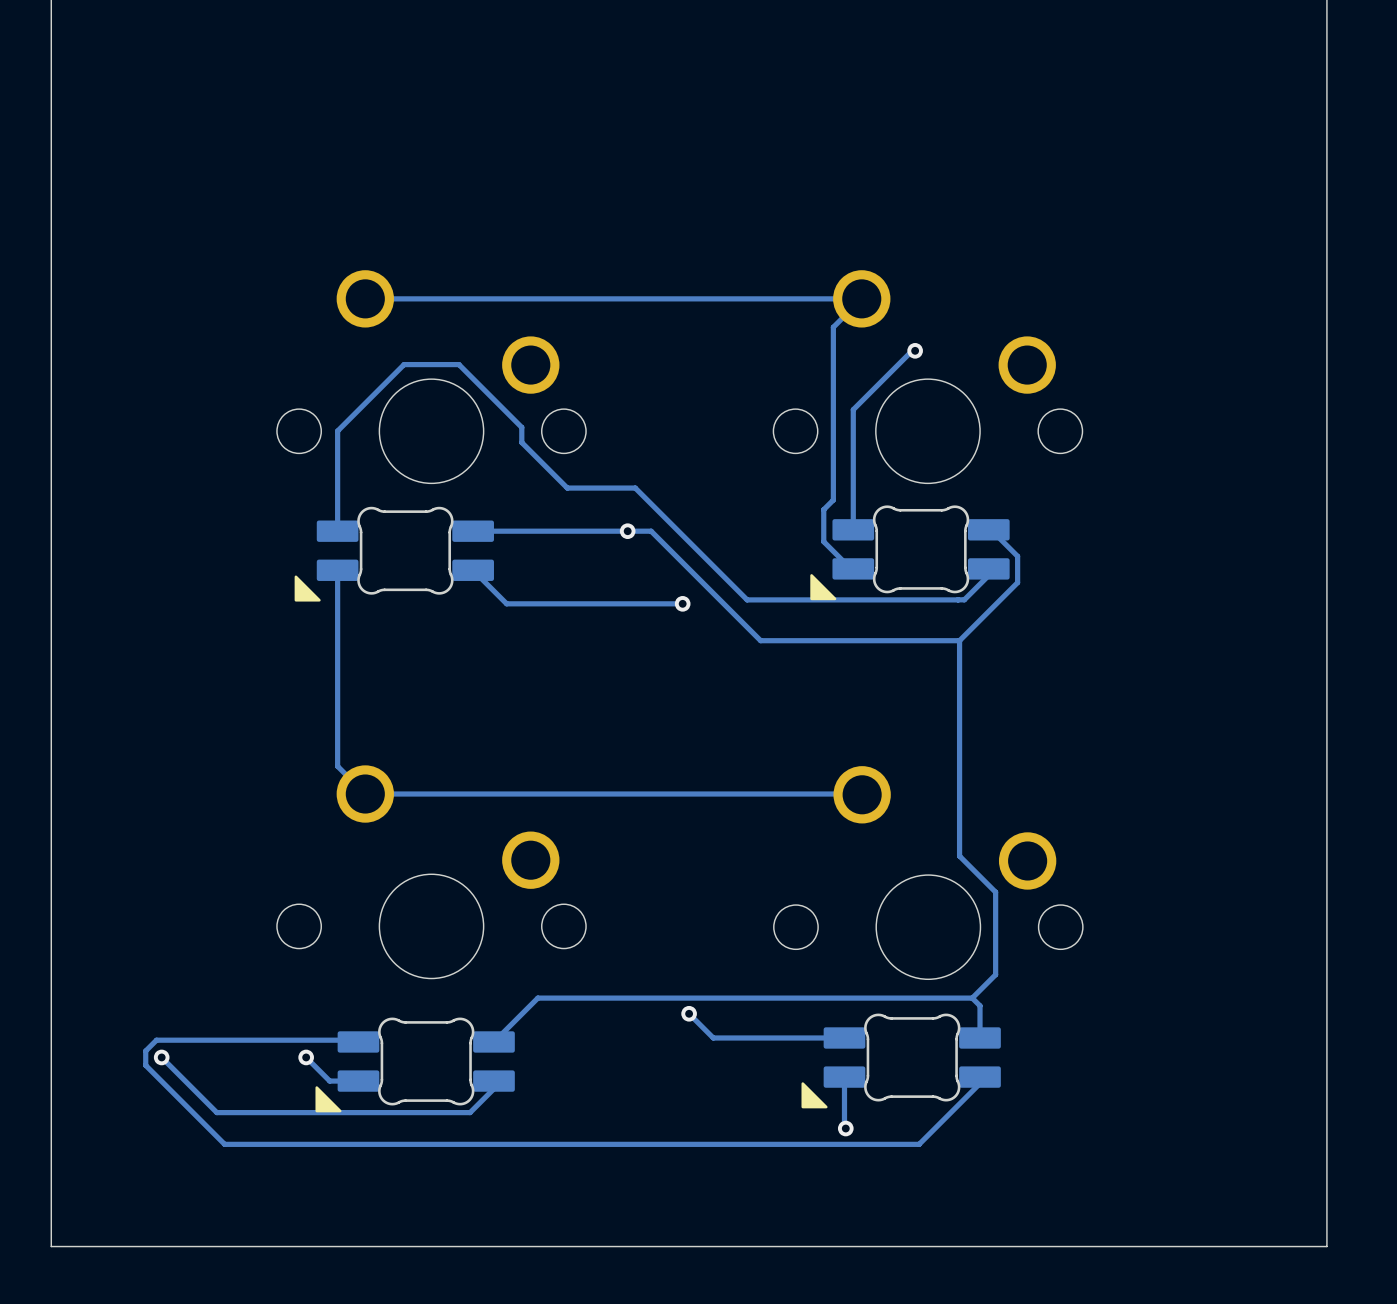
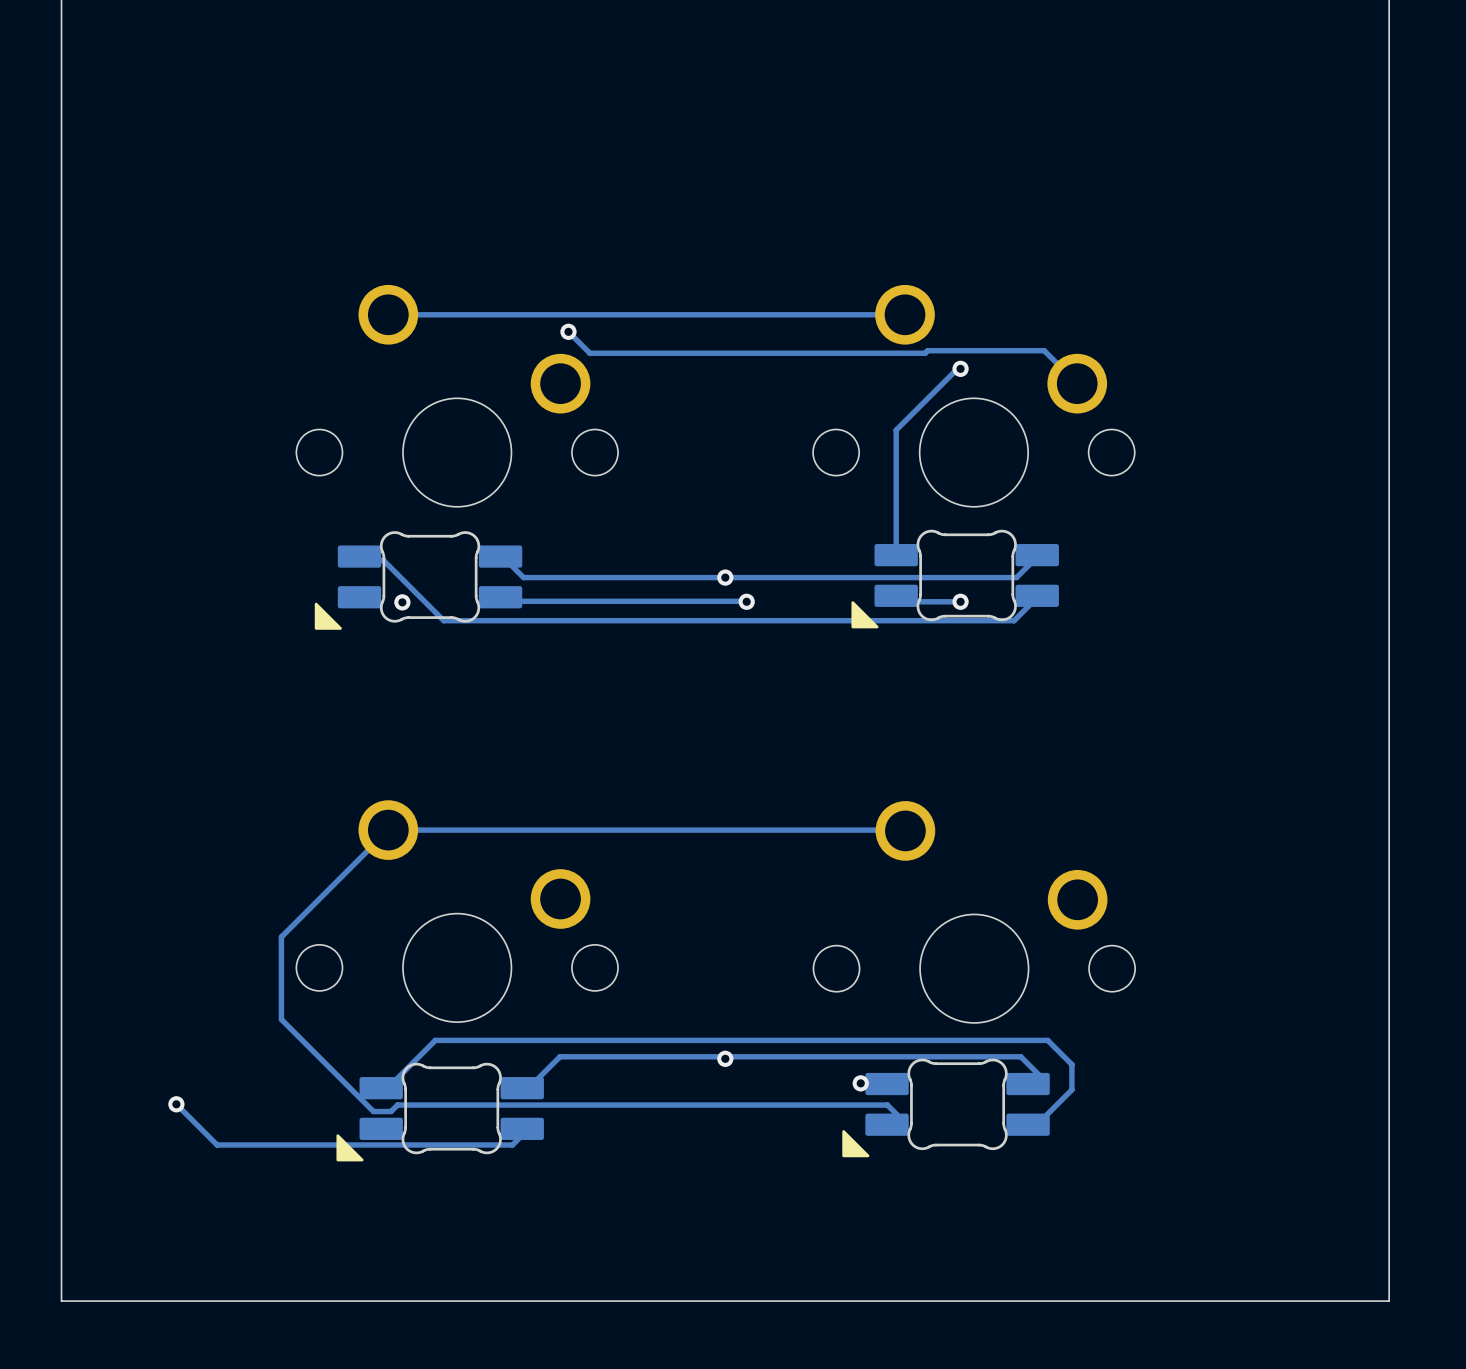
track: (861, 298) (833, 327) (833, 500) (823, 509) (823, 541) (850, 568) (853, 568) -> none
track: none -> (568, 331) (589, 353) (925, 353) (927, 350) (1044, 350) (1077, 383)
via: none -> (568, 331)
track: (988, 529) (991, 529) (1017, 556) (1017, 582) (959, 640) -> none
track: (337, 531) (337, 431) (404, 364) (458, 364) (521, 427) (521, 442) (567, 488) (635, 488) (747, 599) (958, 599) -> none
track: (473, 531) (651, 531) (760, 640) (959, 640) -> none
via: (627, 531) -> none
track: none -> (1036, 557) (1016, 577) (523, 577) (506, 560)
track: none -> (365, 560) (383, 560) (443, 620) (1014, 620) (1036, 597)
via: none -> (725, 577)
track: (988, 568) (988, 575) (964, 599) (958, 599) -> none
track: (337, 570) (337, 766) (365, 794) -> (900, 1117) (887, 1105) (397, 1105) (391, 1111) (373, 1111) (281, 1019) (281, 937) (388, 830)
track: (473, 570) (506, 603) (682, 603) -> none
track: none -> (895, 597) (899, 601) (960, 601)
track: none -> (506, 601) (746, 601)
via: none -> (746, 601)
via: none -> (960, 601)
via: none -> (402, 602)
via: (682, 603) -> none
track: (959, 640) (959, 856) (995, 892) (995, 974) (972, 998) -> none
track: (972, 998) (537, 998) (493, 1041) -> none
track: (972, 998) (980, 1005) (980, 1037) -> none
track: (689, 1013) (713, 1037) (844, 1037) -> none
track: none -> (1041, 1077) (1020, 1056) (559, 1056) (532, 1084)
track: none -> (391, 1084) (435, 1040) (1047, 1040) (1071, 1064) (1071, 1089) (1043, 1117) (1041, 1117)
track: (358, 1041) (356, 1040) (156, 1040) (145, 1051) (145, 1065) (224, 1144) (919, 1144) (980, 1083) (980, 1077) -> none
track: (306, 1057) (329, 1081) (358, 1081) -> none
via: (306, 1057) -> none
track: (844, 1077) (845, 1128) -> none
track: (493, 1081) (493, 1088) (470, 1112) (216, 1112) (200, 1096) -> (532, 1125) (512, 1144) (217, 1144)
via position: (845, 1128) -> (860, 1083)

